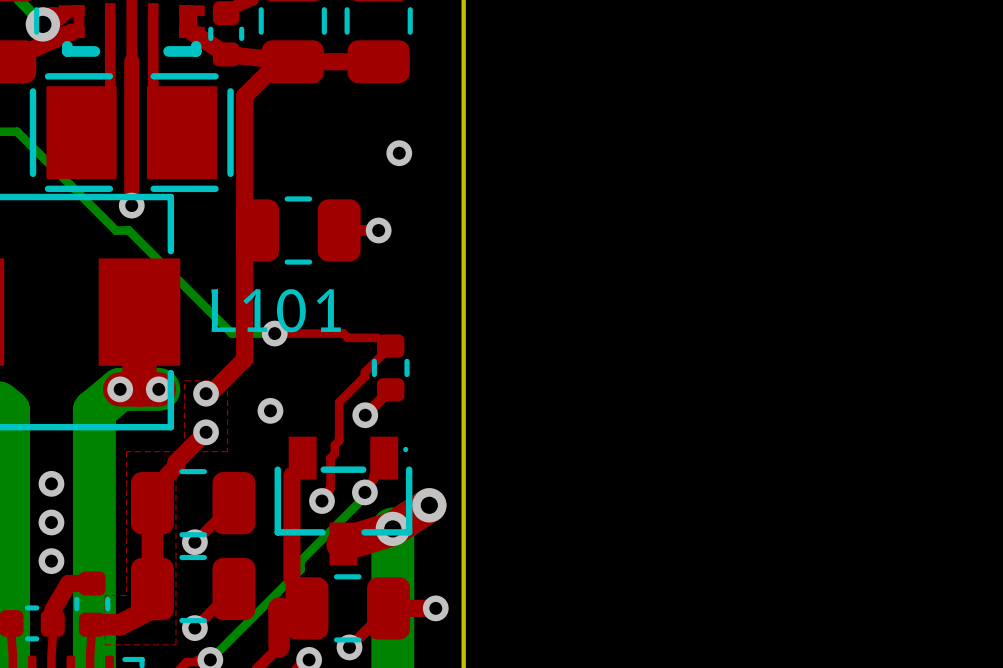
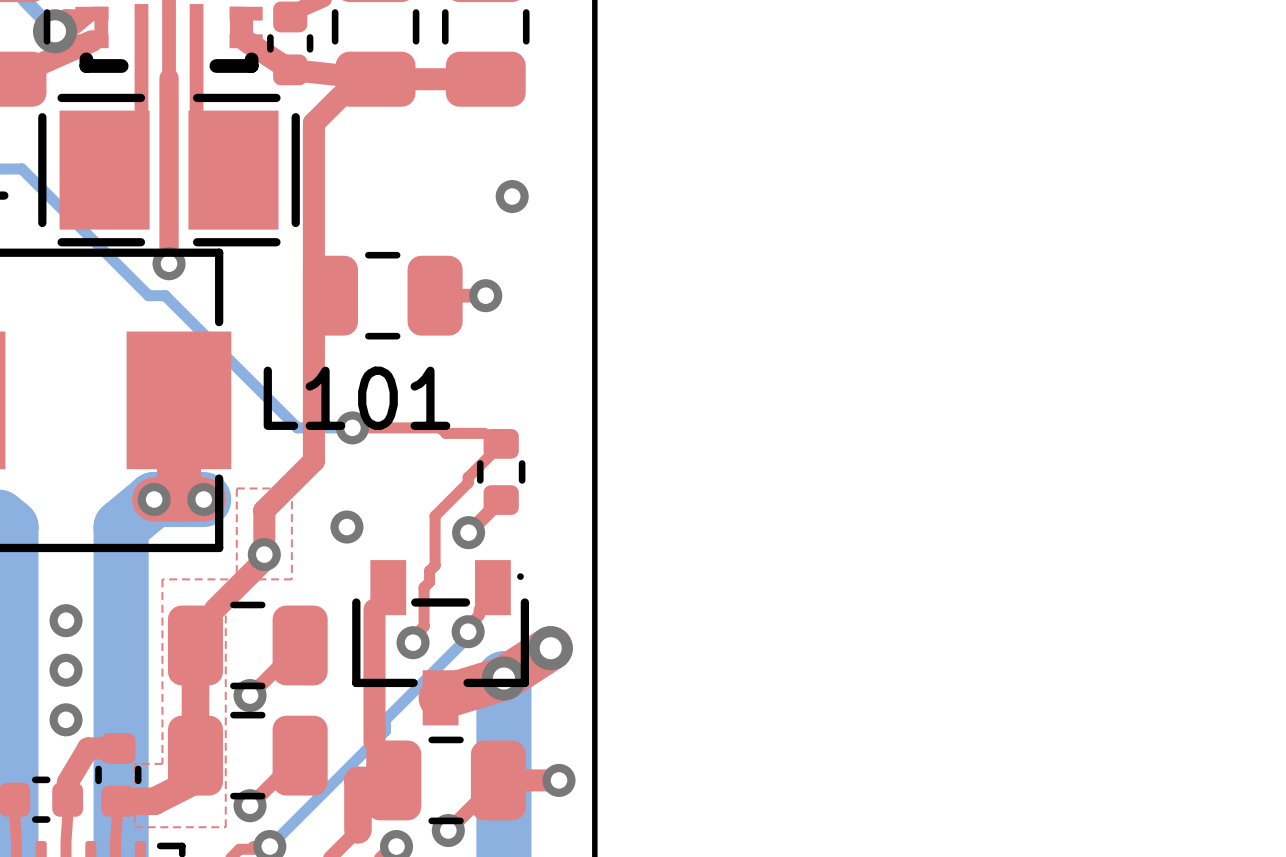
via: (206, 393) -> none
top track: (206, 432) (175, 462) (175, 466) -> (264, 510) (264, 560) (225, 598)

